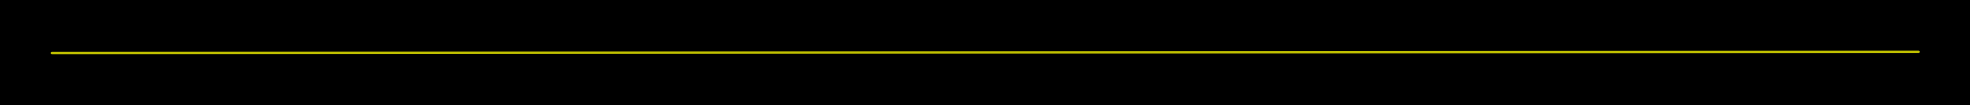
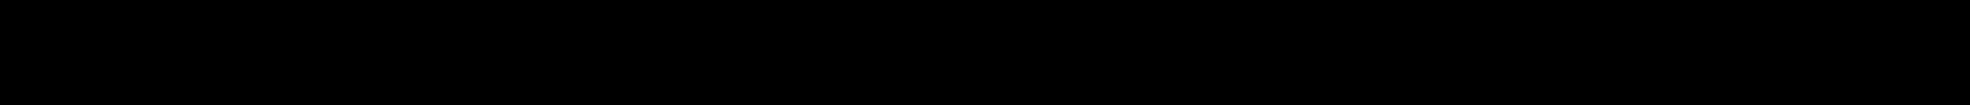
board edge: (1918, 51) (51, 53) -> none

